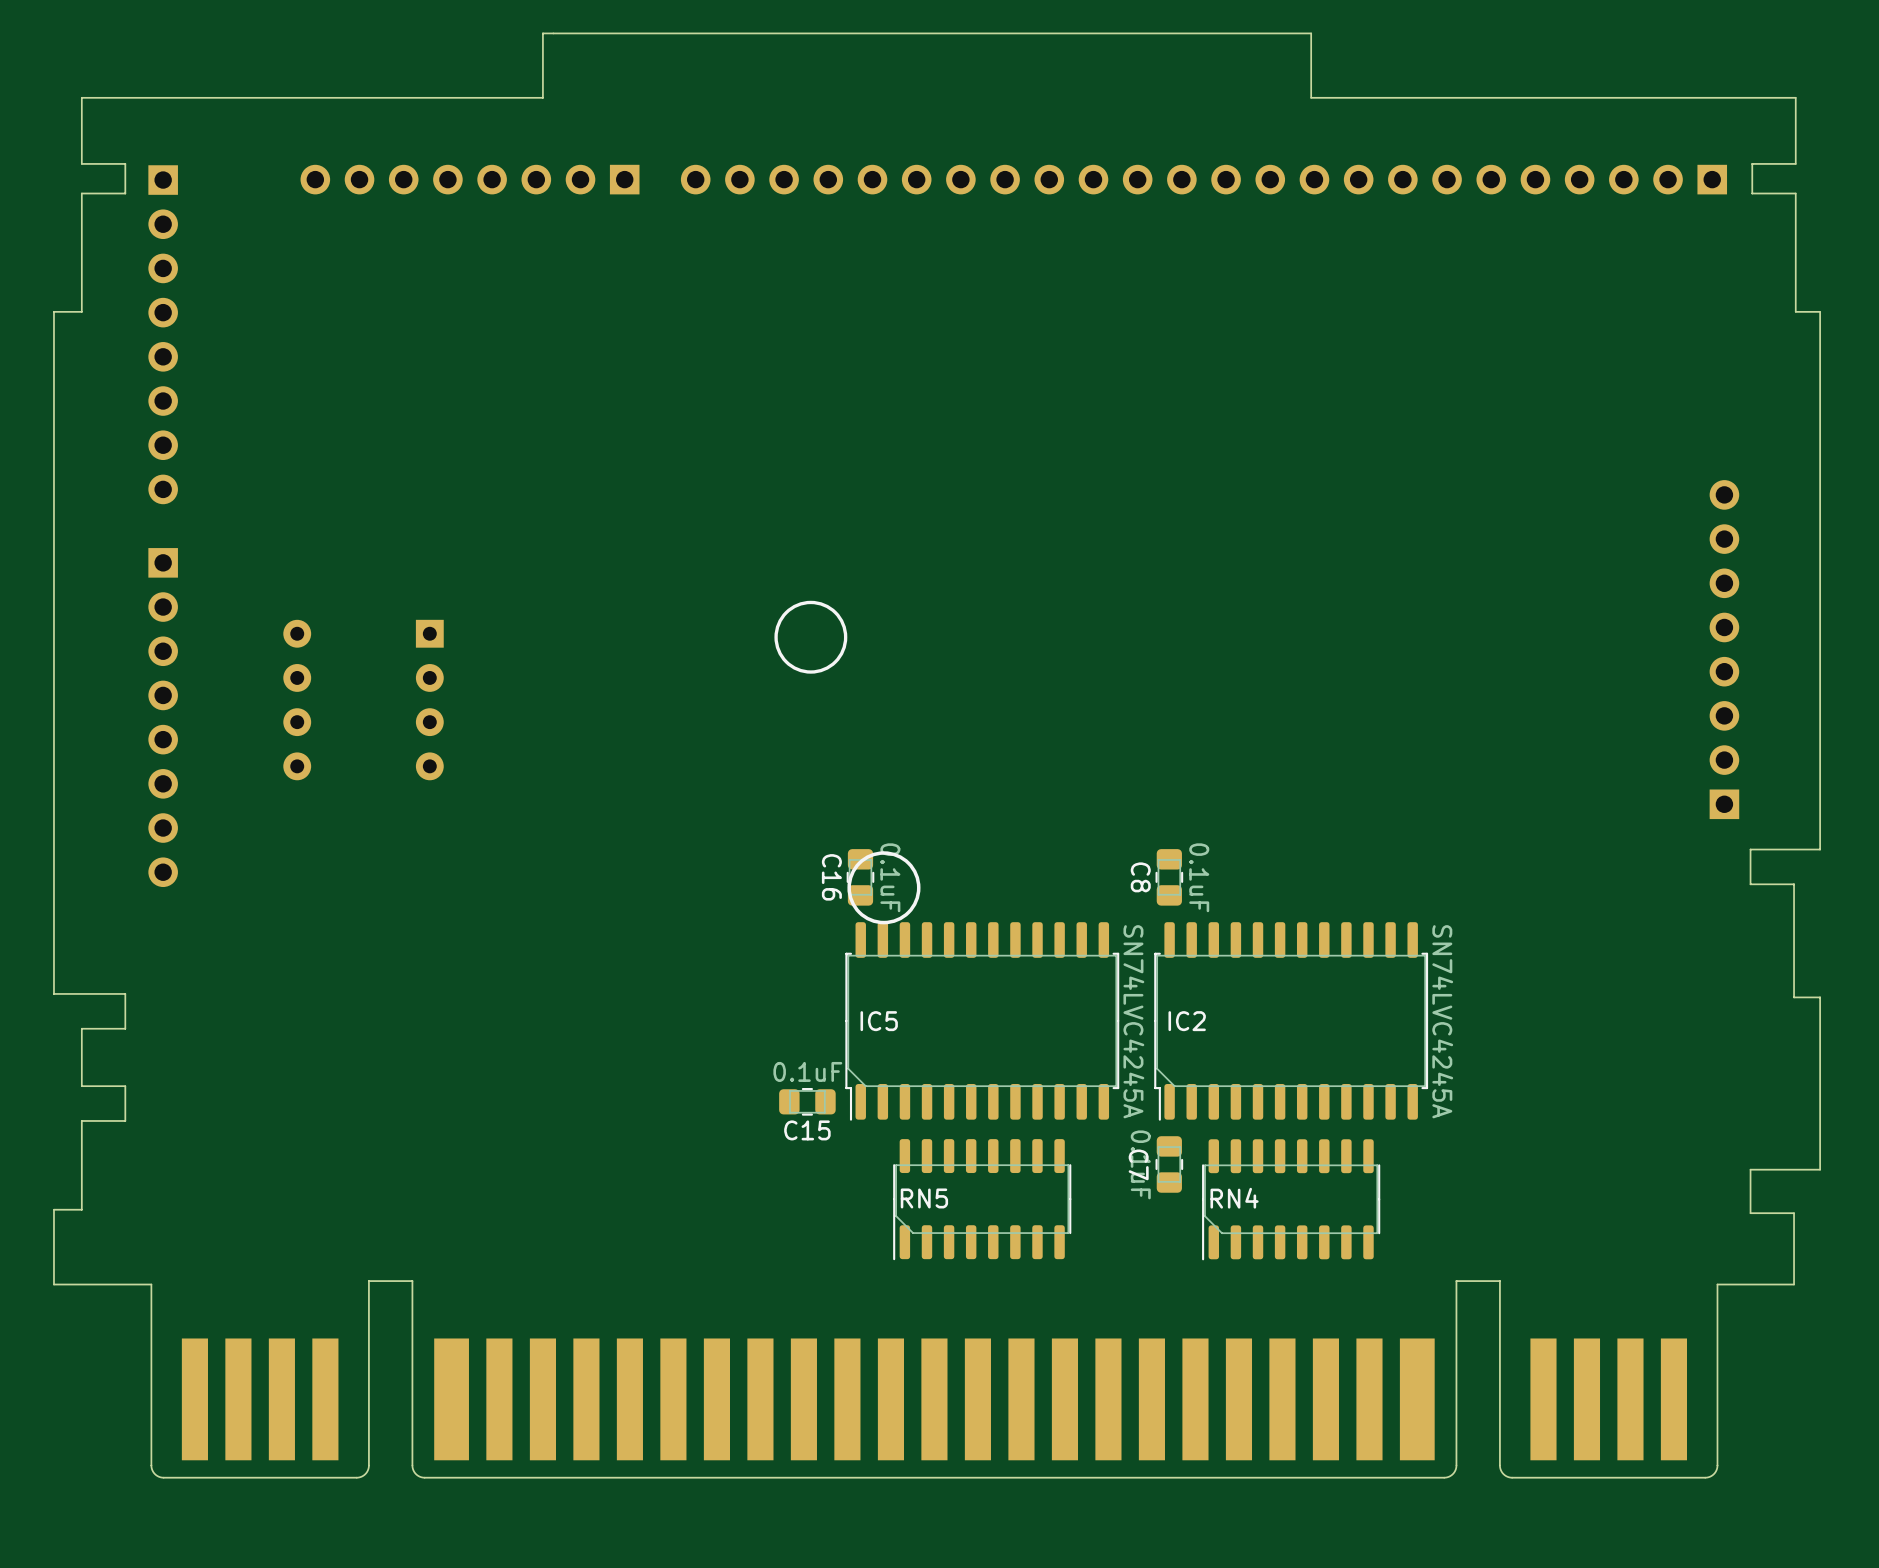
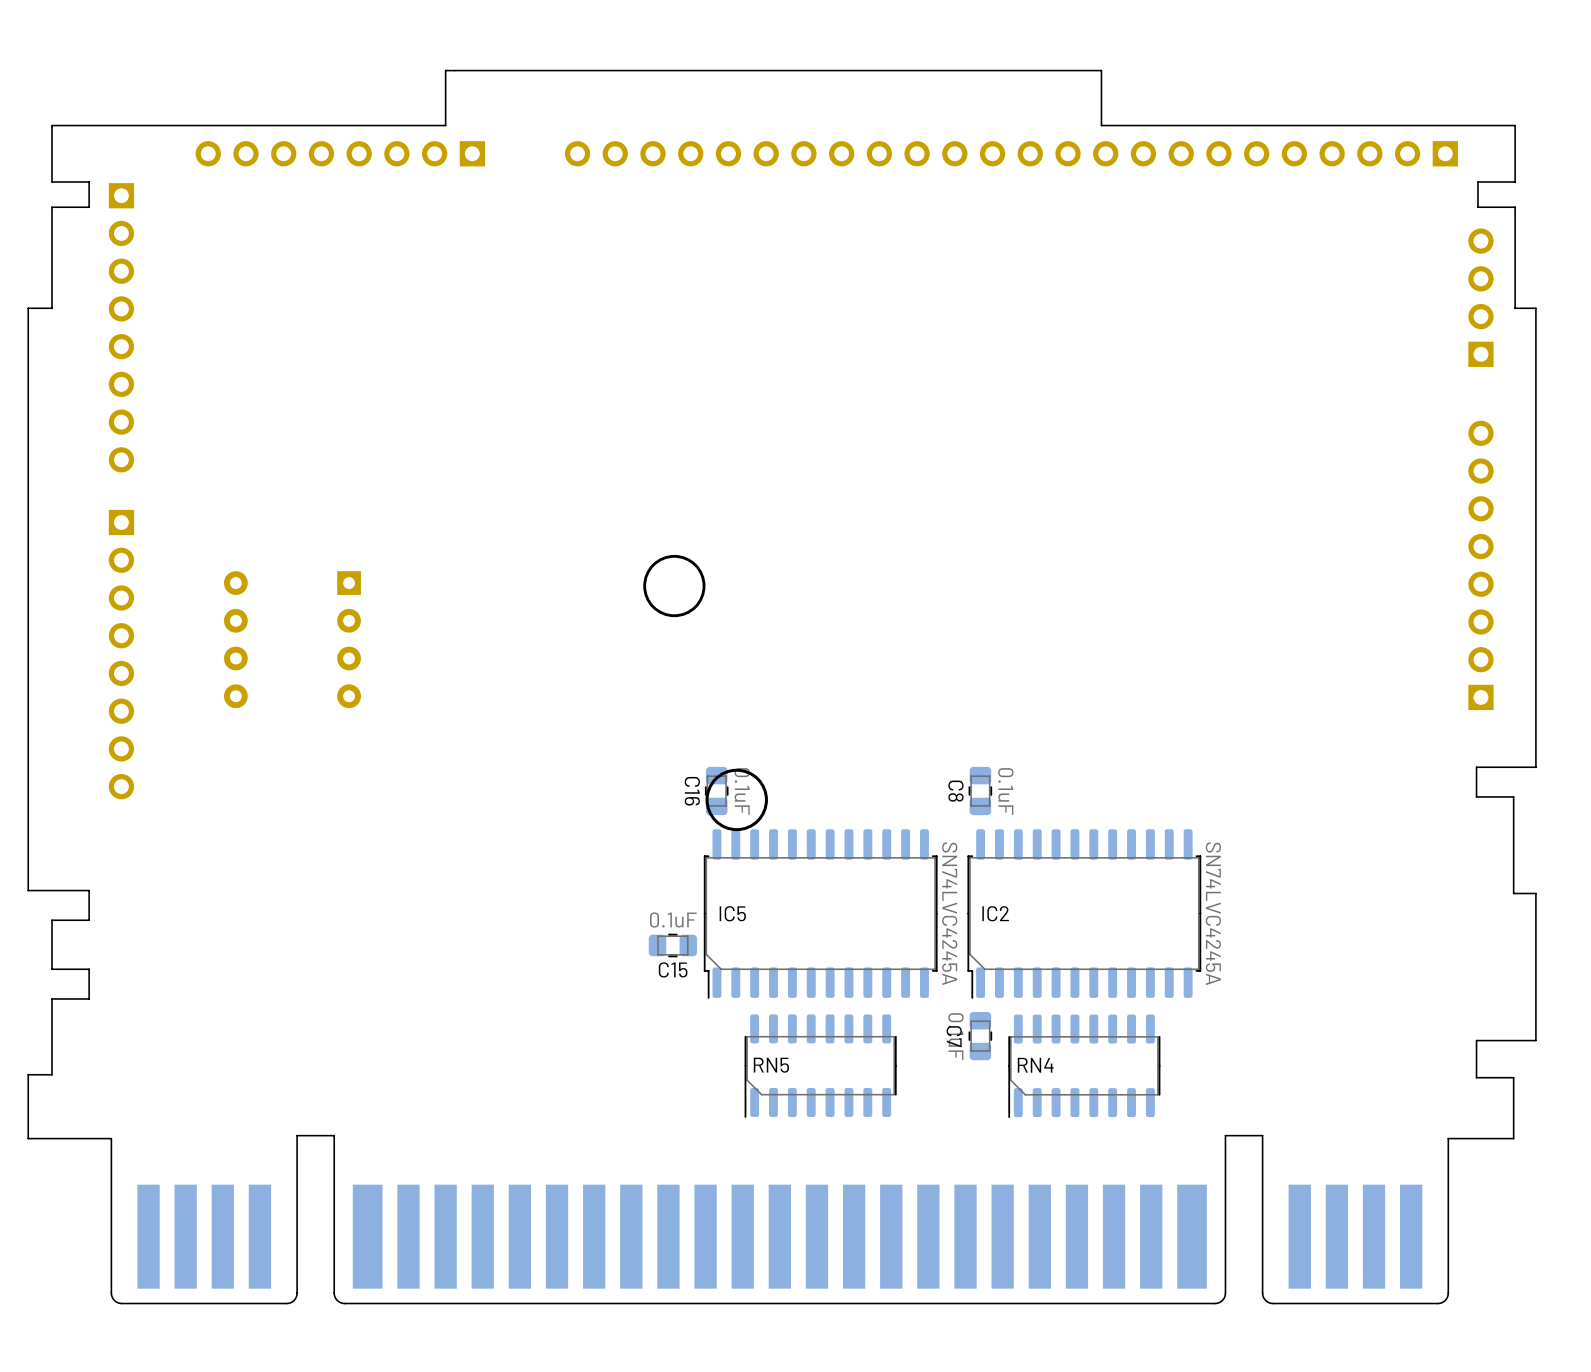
part position: (470, 179) -> (340, 153)
part position: (1203, 179) -> (1011, 153)
part: none -> (1480, 297)
part position: (1724, 649) -> (1480, 565)
C15 position: (807, 1101) -> (672, 945)

